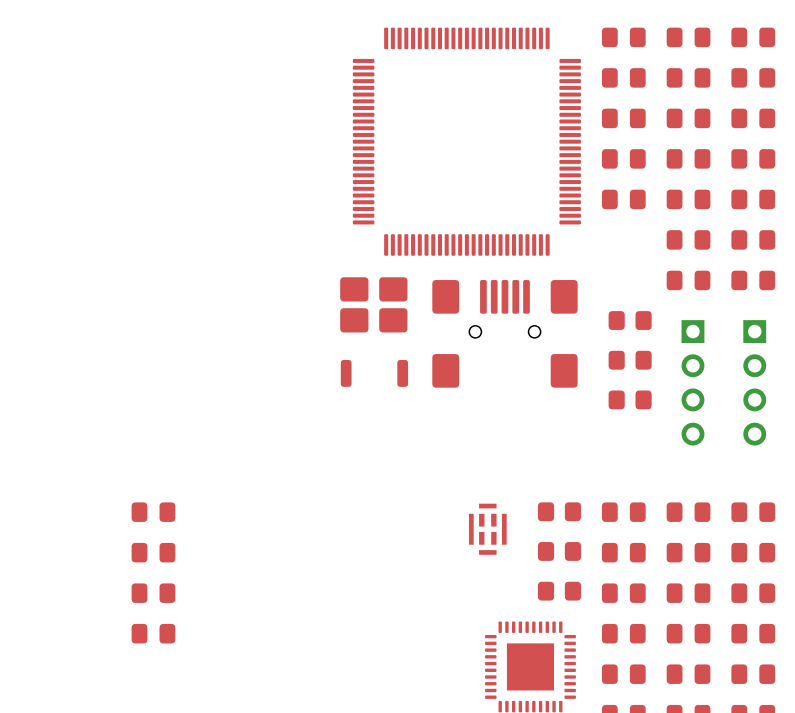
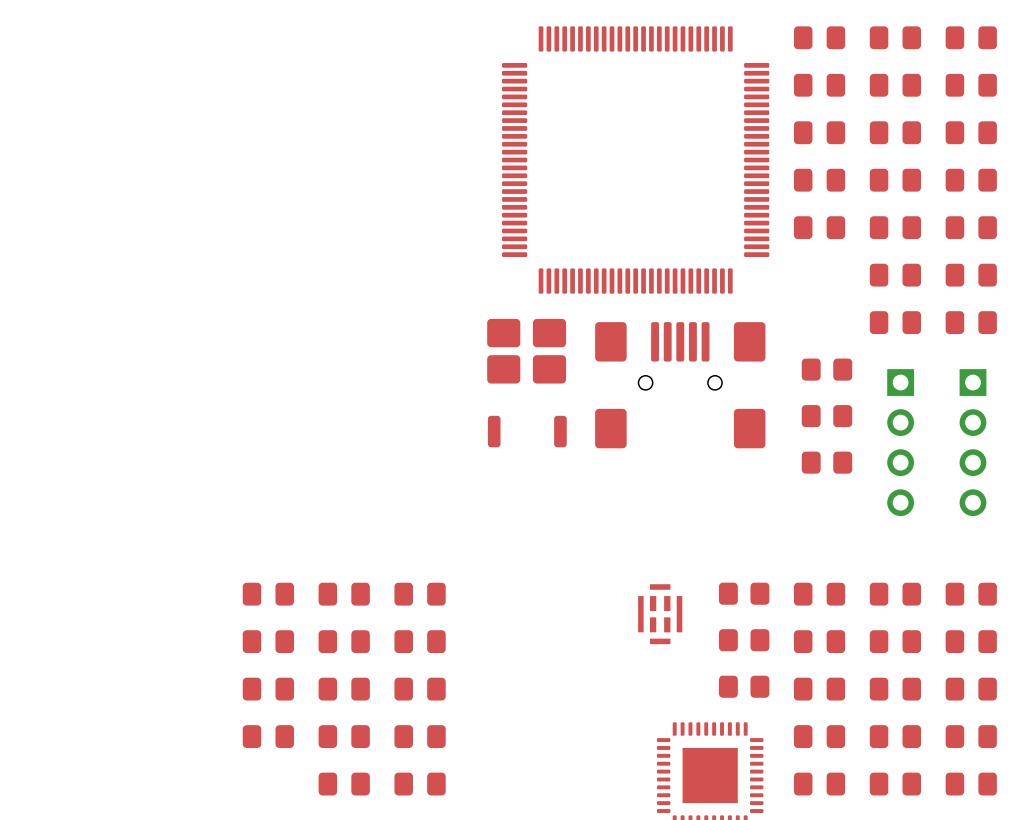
part: none -> (344, 594)
part: none -> (420, 594)
part: none -> (344, 641)
part: none -> (420, 641)
part: none -> (344, 689)
part: none -> (420, 689)
part: none -> (344, 736)
part: none -> (420, 736)
part: none -> (344, 784)
part: none -> (420, 784)

